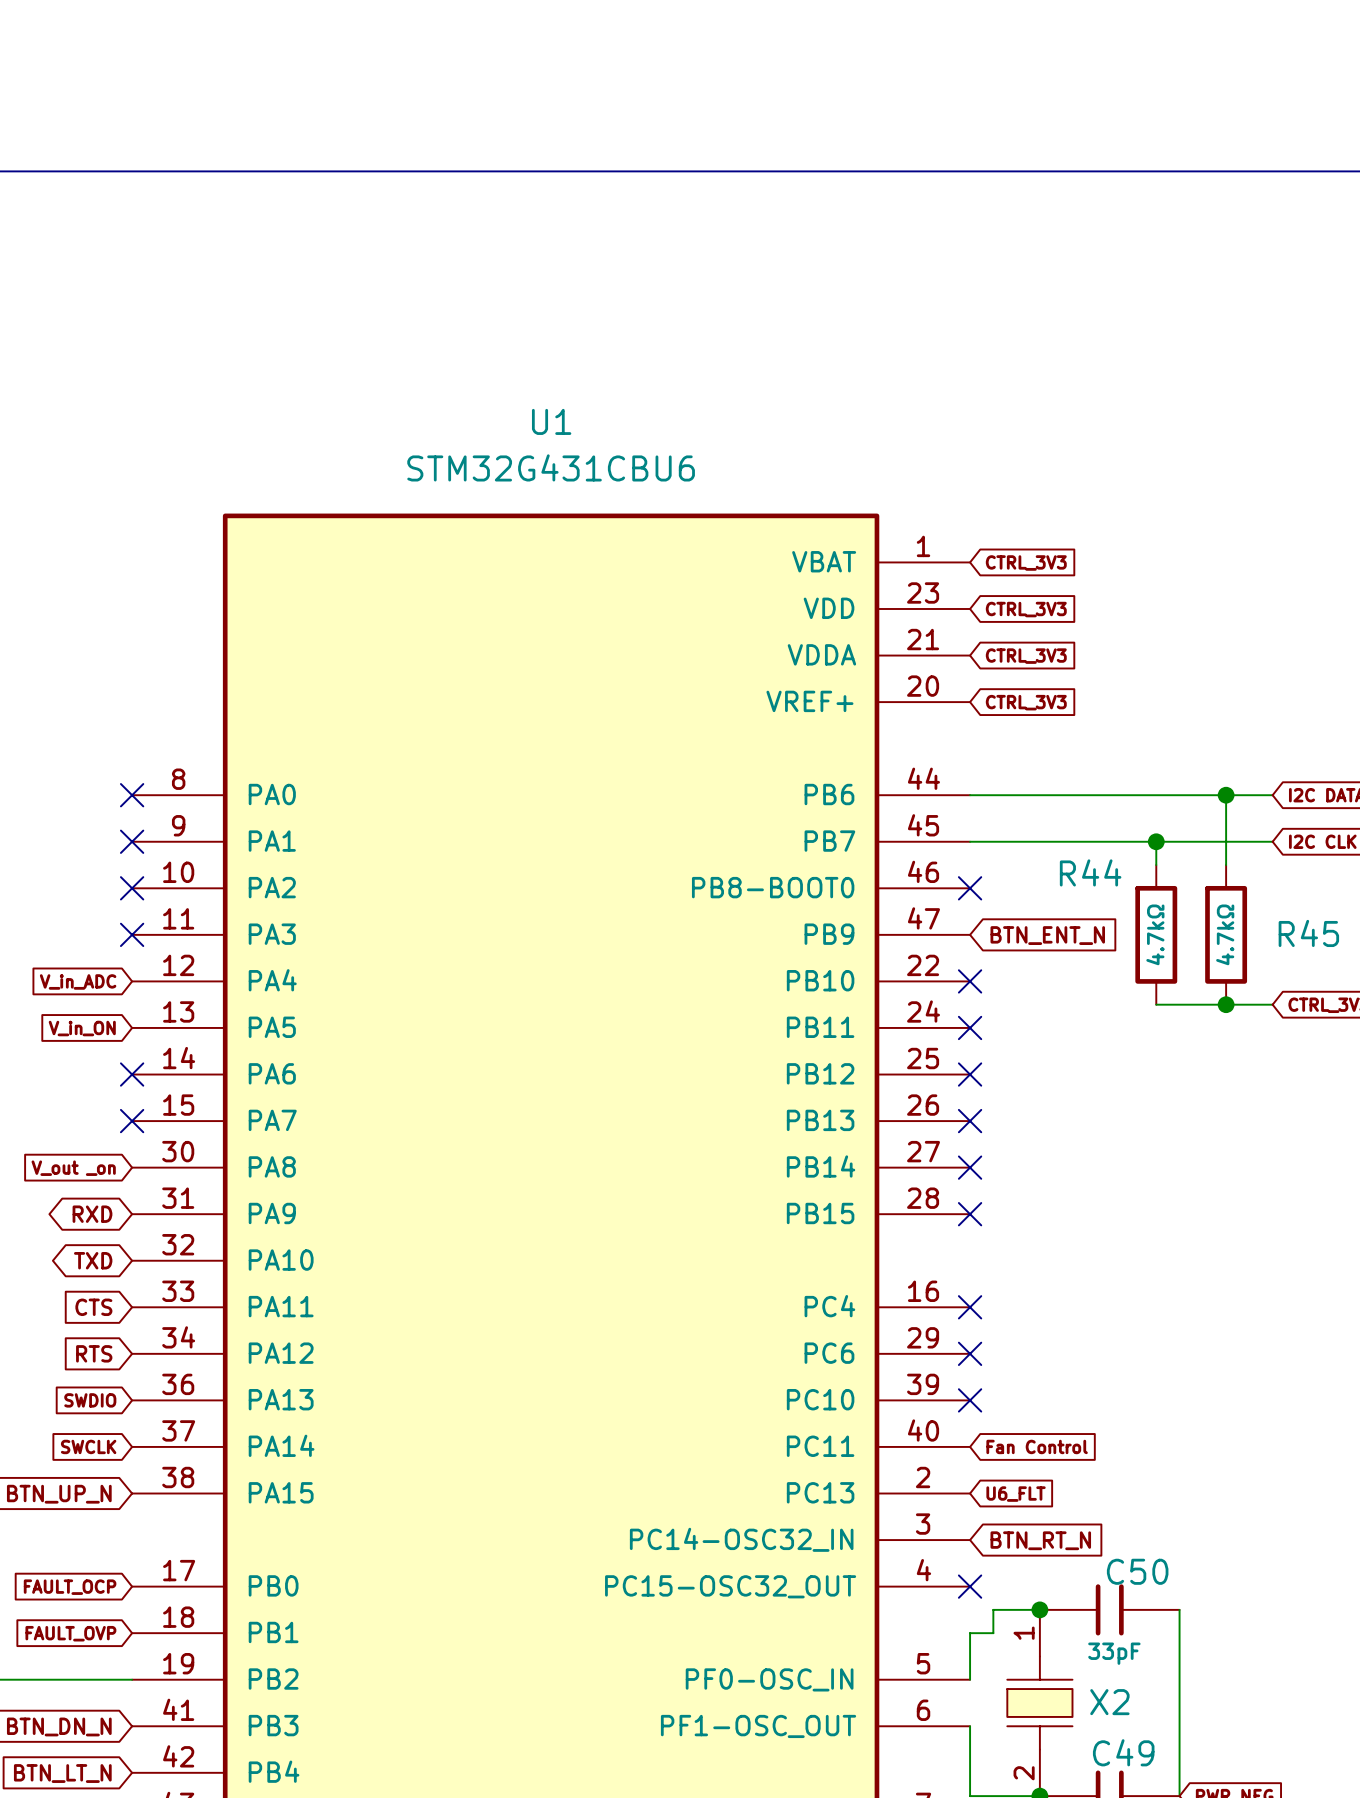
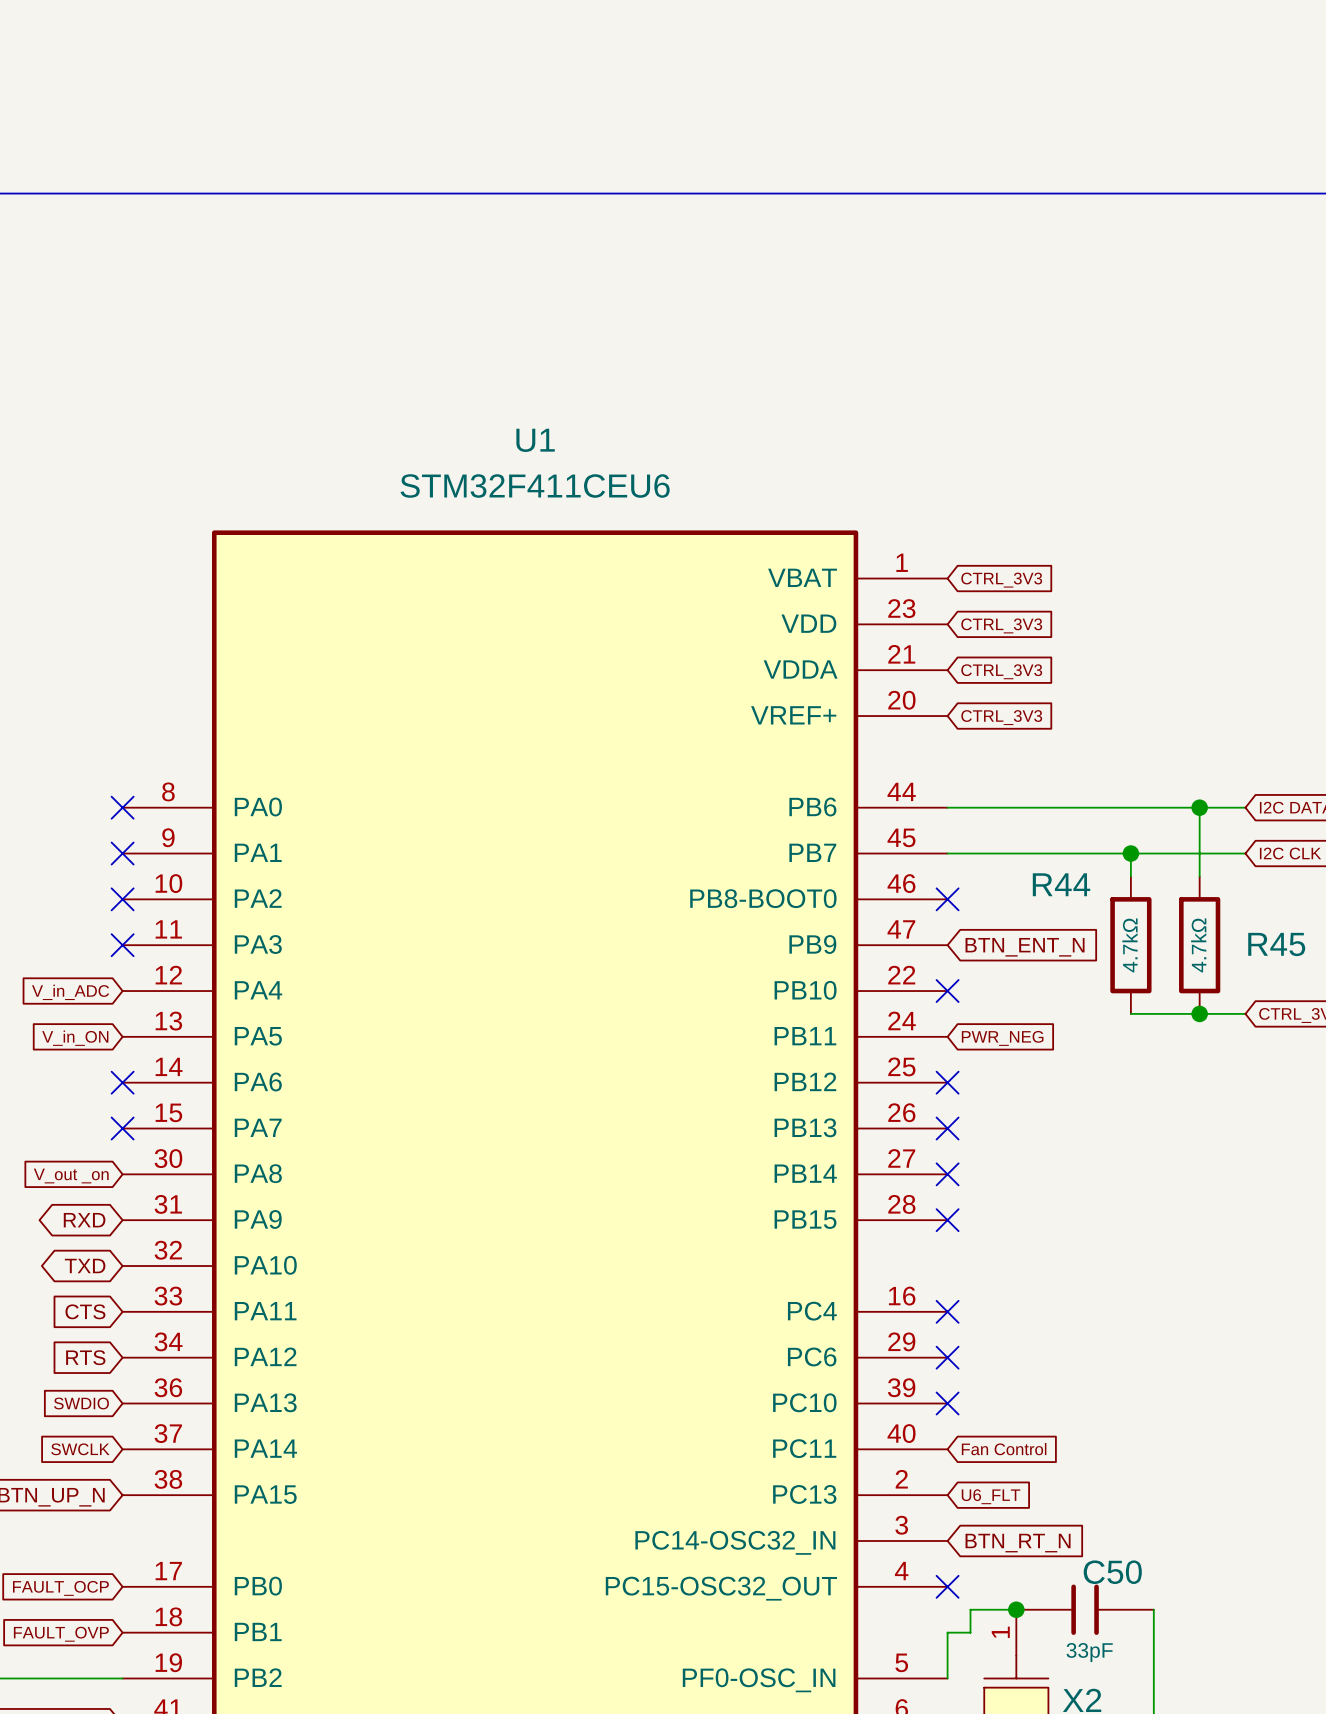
U1 value: STM32G431CBU6 (551, 467) -> STM32F411CEU6 (535, 486)
no-connect mark: (970, 1027) -> none
global label: none -> PWR_NEG (1002, 1038)

